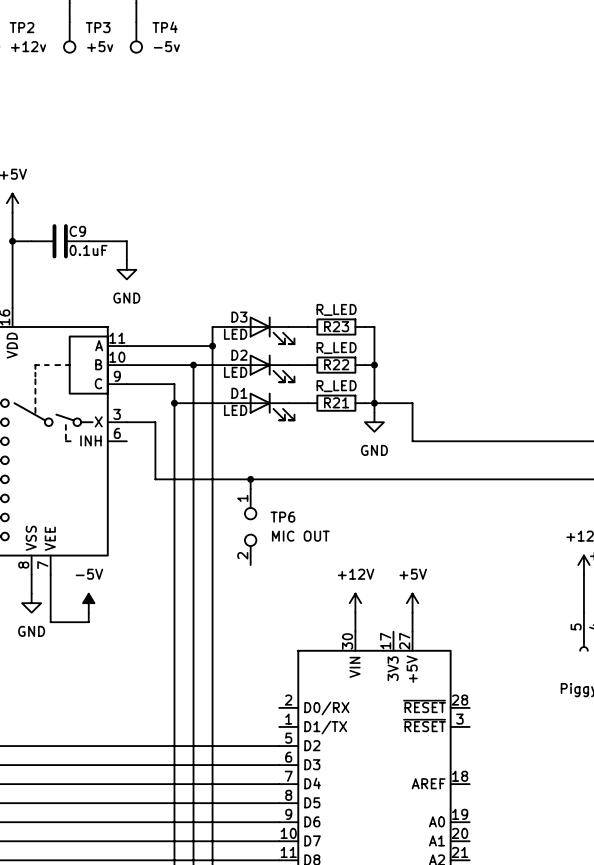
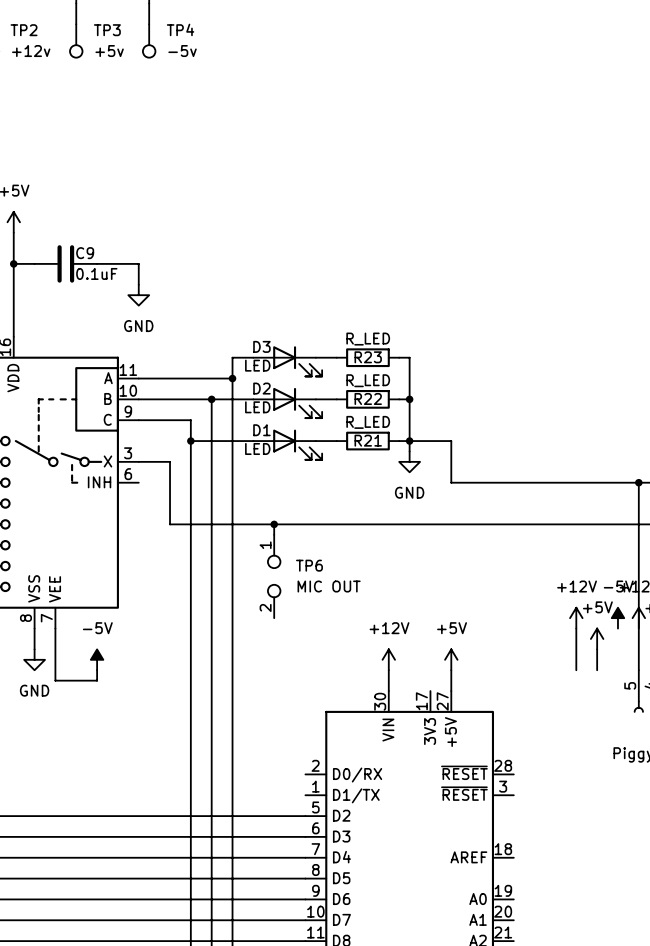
wire: none -> (638, 482) (638, 628)
junction: none -> (638, 482)
power symbol: none -> +12V (576, 618)
power symbol: none -> -5V (617, 618)
wire: none -> (576, 628) (576, 670)
power symbol: none -> +5V (597, 638)
wire: none -> (597, 649) (597, 670)

